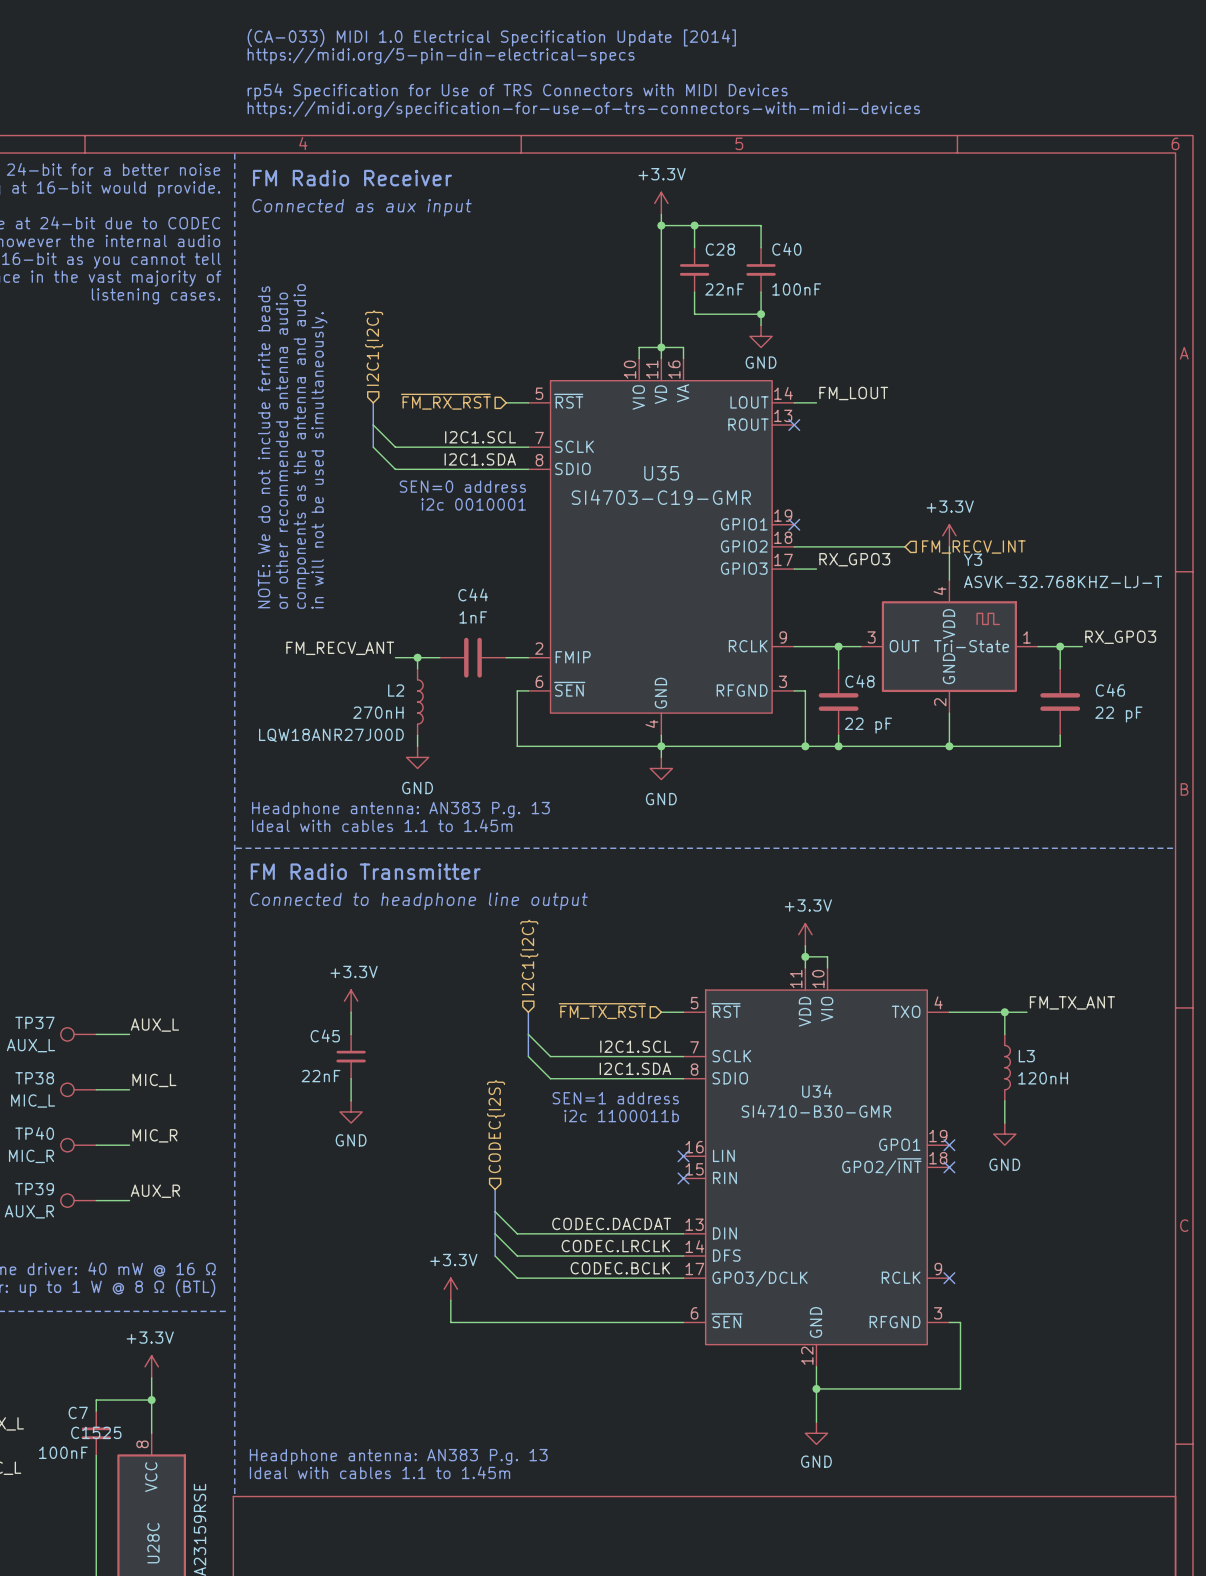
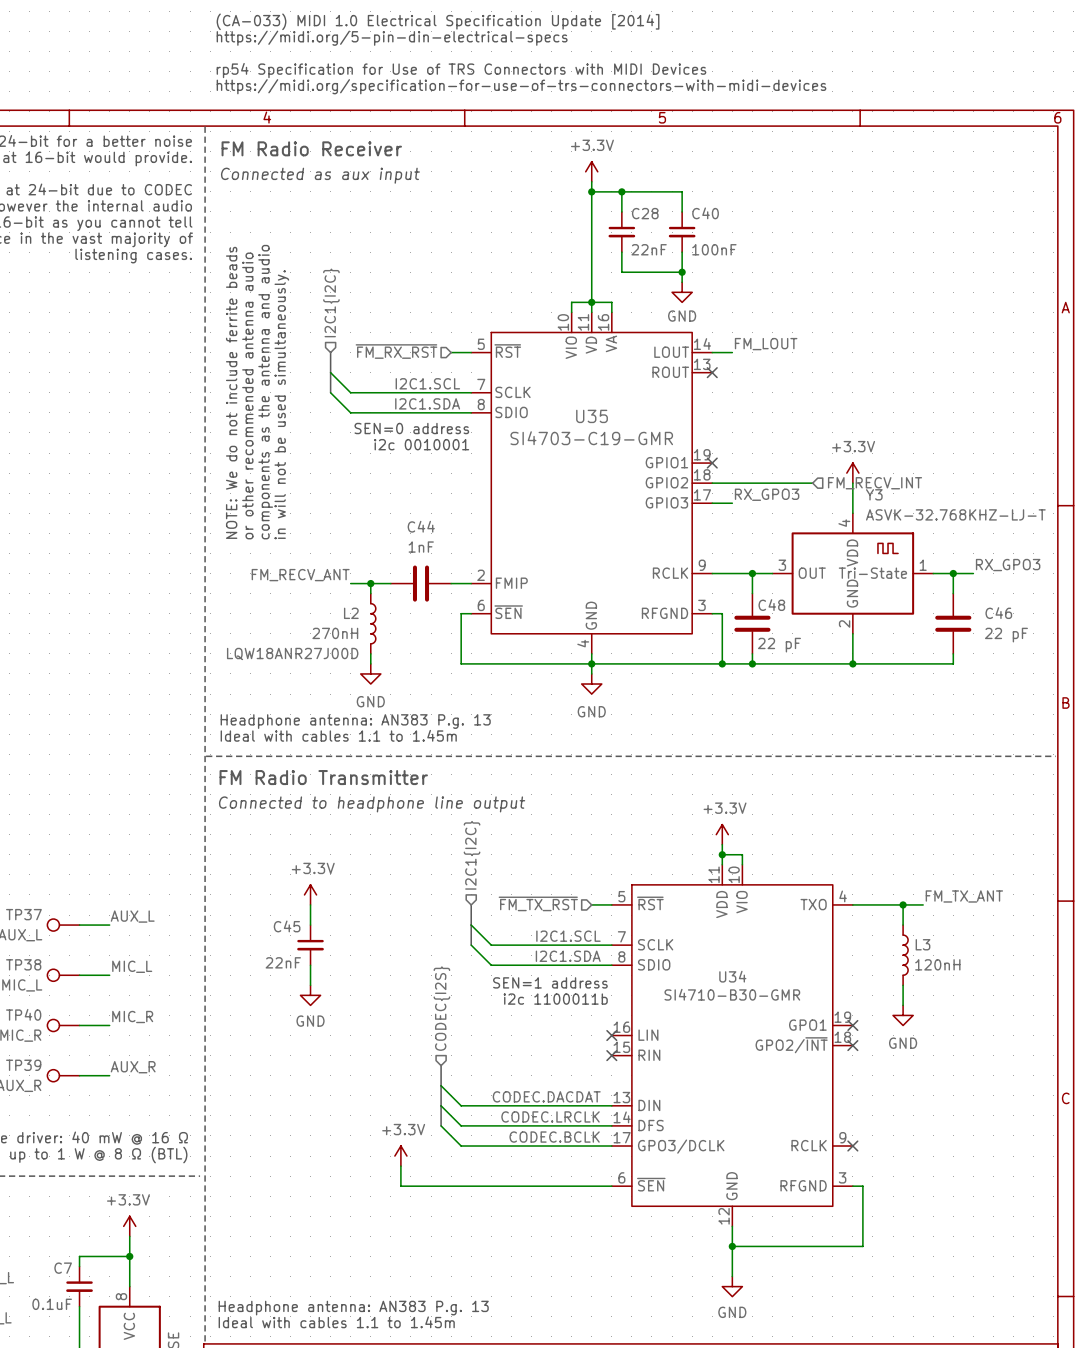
C7 text: C1525 (96, 1432) -> none
C7 value: 100nF (63, 1452) -> 0.1uF (52, 1304)

